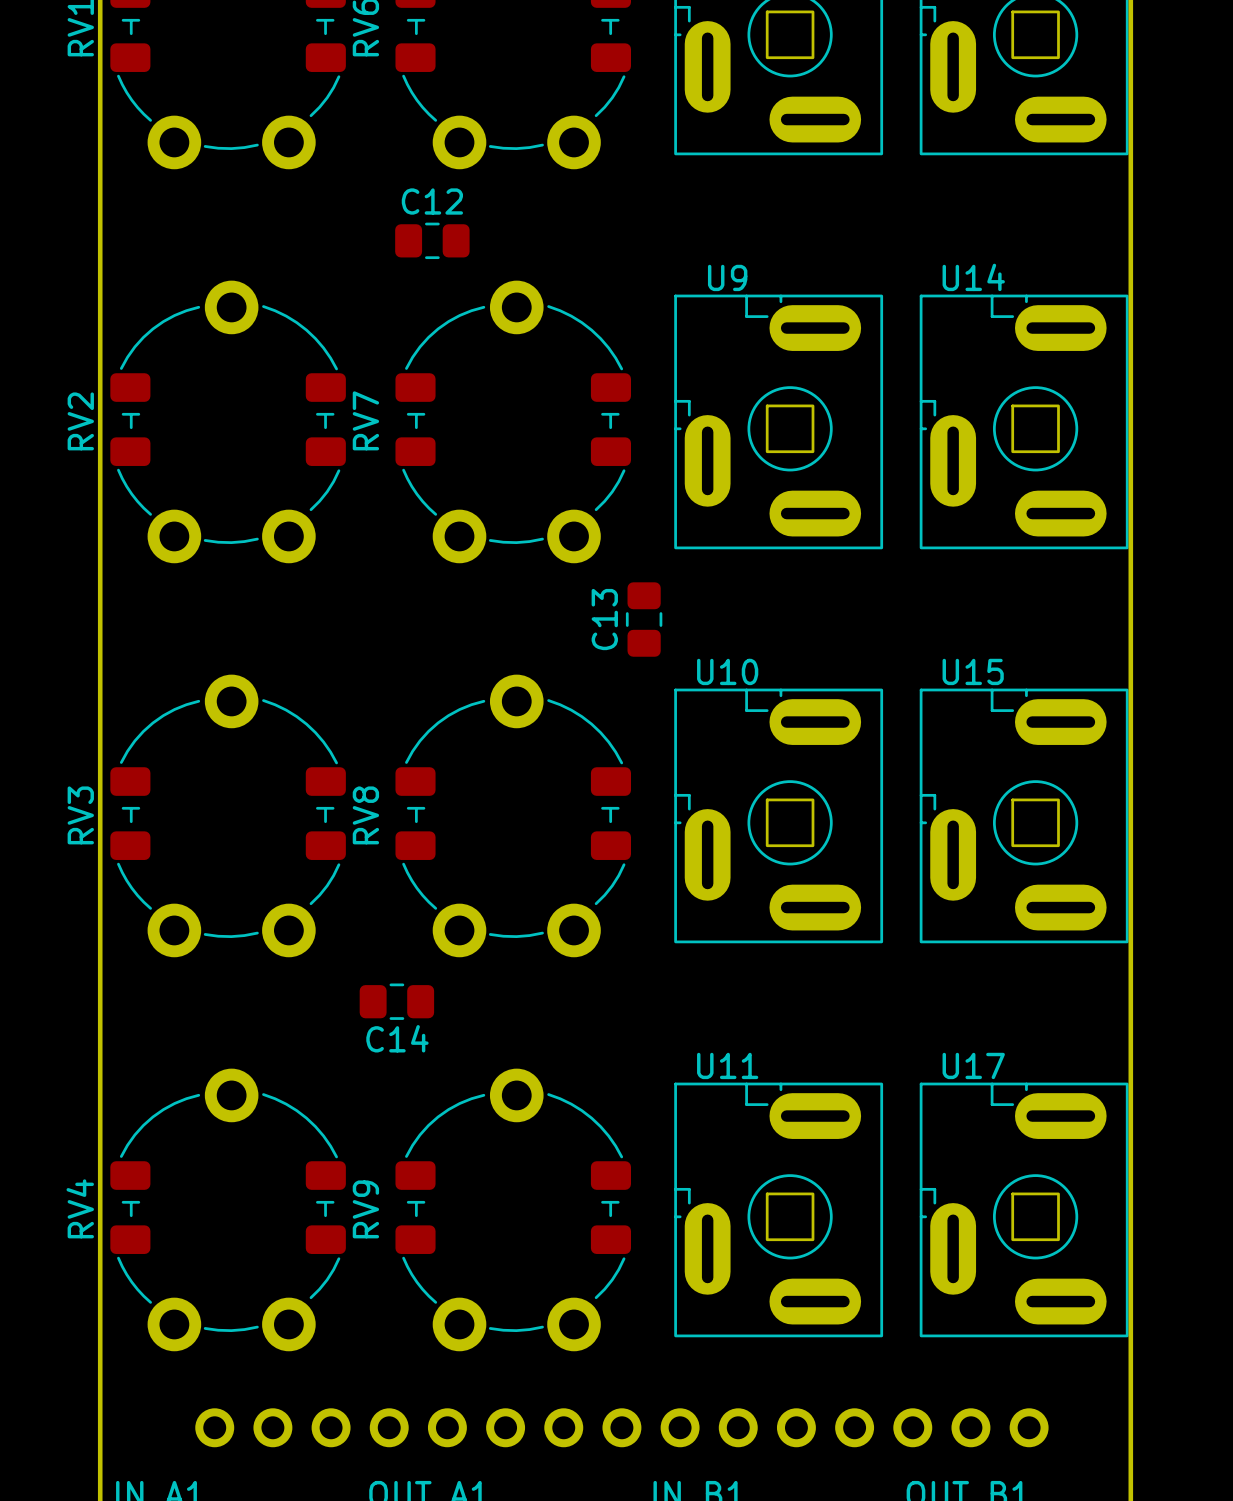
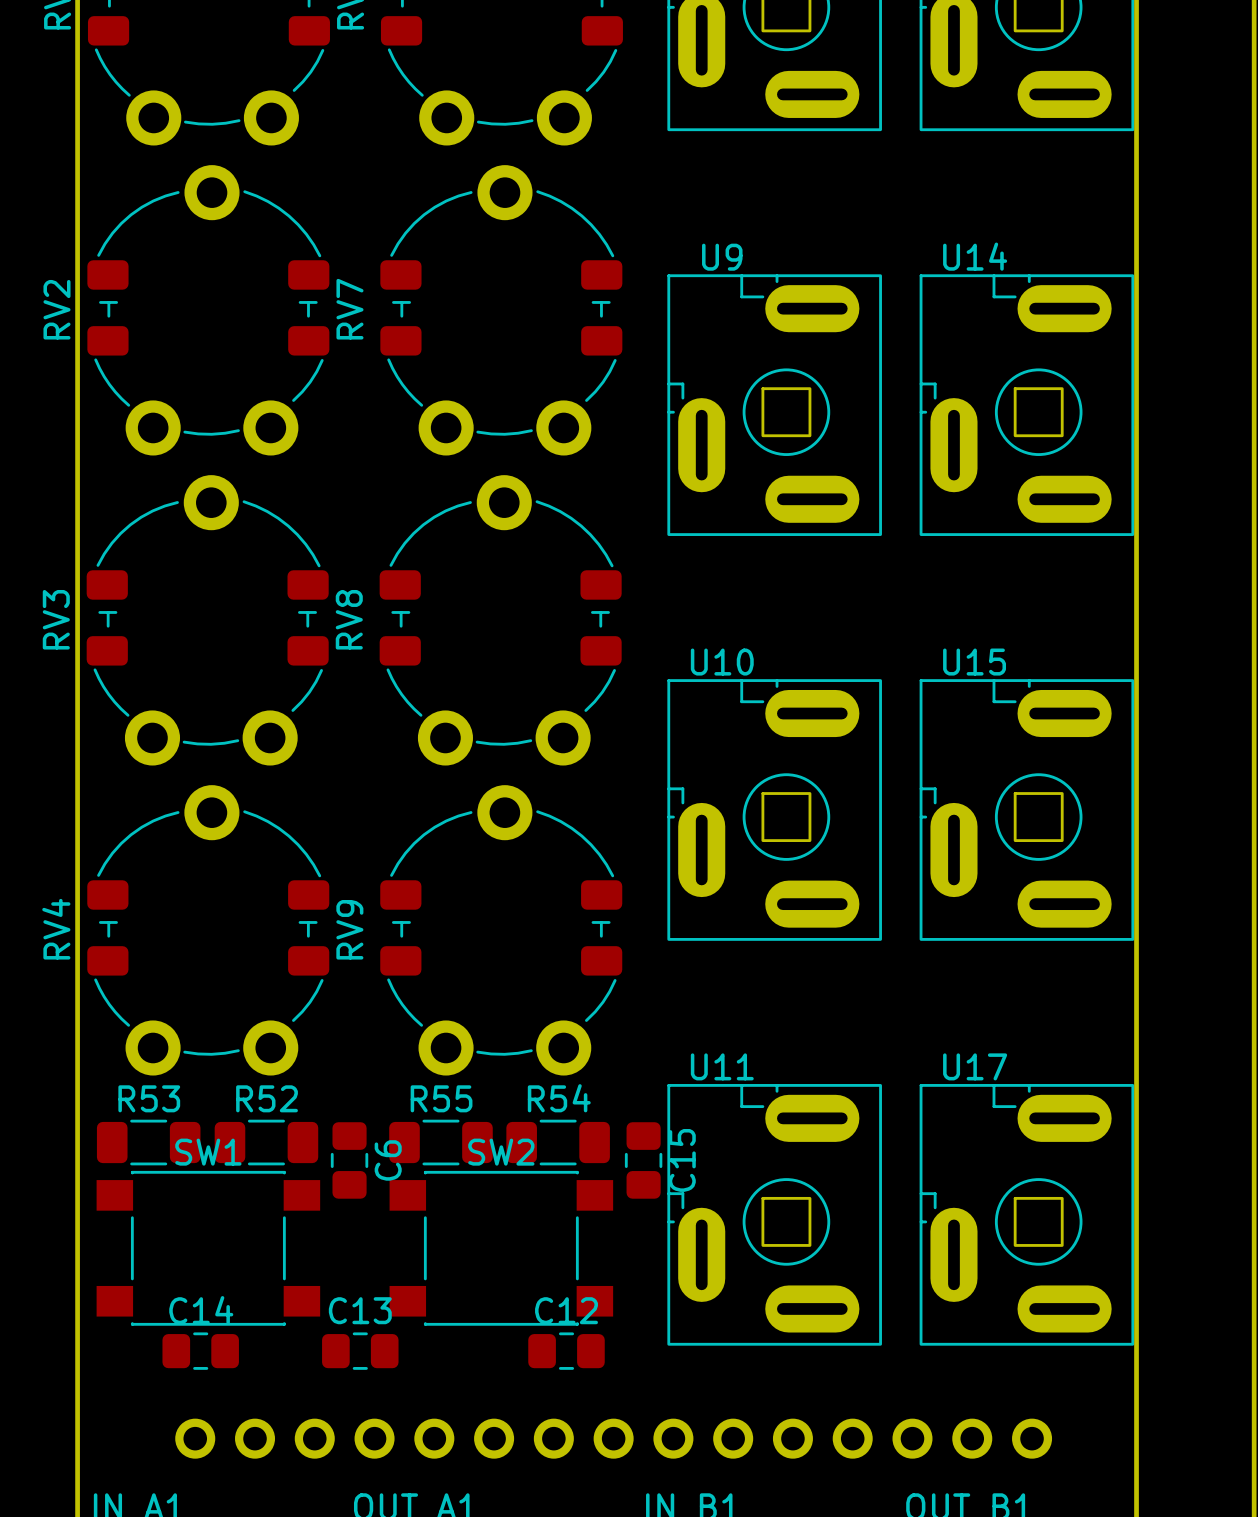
C12 position: (432, 240) -> (566, 1351)
RV2 position: (228, 421) -> (208, 310)
RV7 position: (513, 421) -> (501, 310)
C13 rotation: 0° (644, 619) -> 90° clockwise (360, 1351)
C13 position: (644, 619) -> (360, 1351)
RV3 position: (228, 815) -> (207, 620)
RV8 position: (513, 815) -> (500, 620)
C14 position: (396, 1001) -> (200, 1351)
C14 name position: C14 (397, 1038) -> C14 (201, 1310)
R53: none -> (148, 1142)
R52: none -> (266, 1142)
R55: none -> (440, 1142)
R54: none -> (558, 1142)
C6: none -> (349, 1160)
C15: none -> (643, 1160)
RV4 position: (228, 1209) -> (208, 930)
RV9 position: (513, 1209) -> (501, 930)
SW1: none -> (208, 1248)
SW2: none -> (501, 1248)

